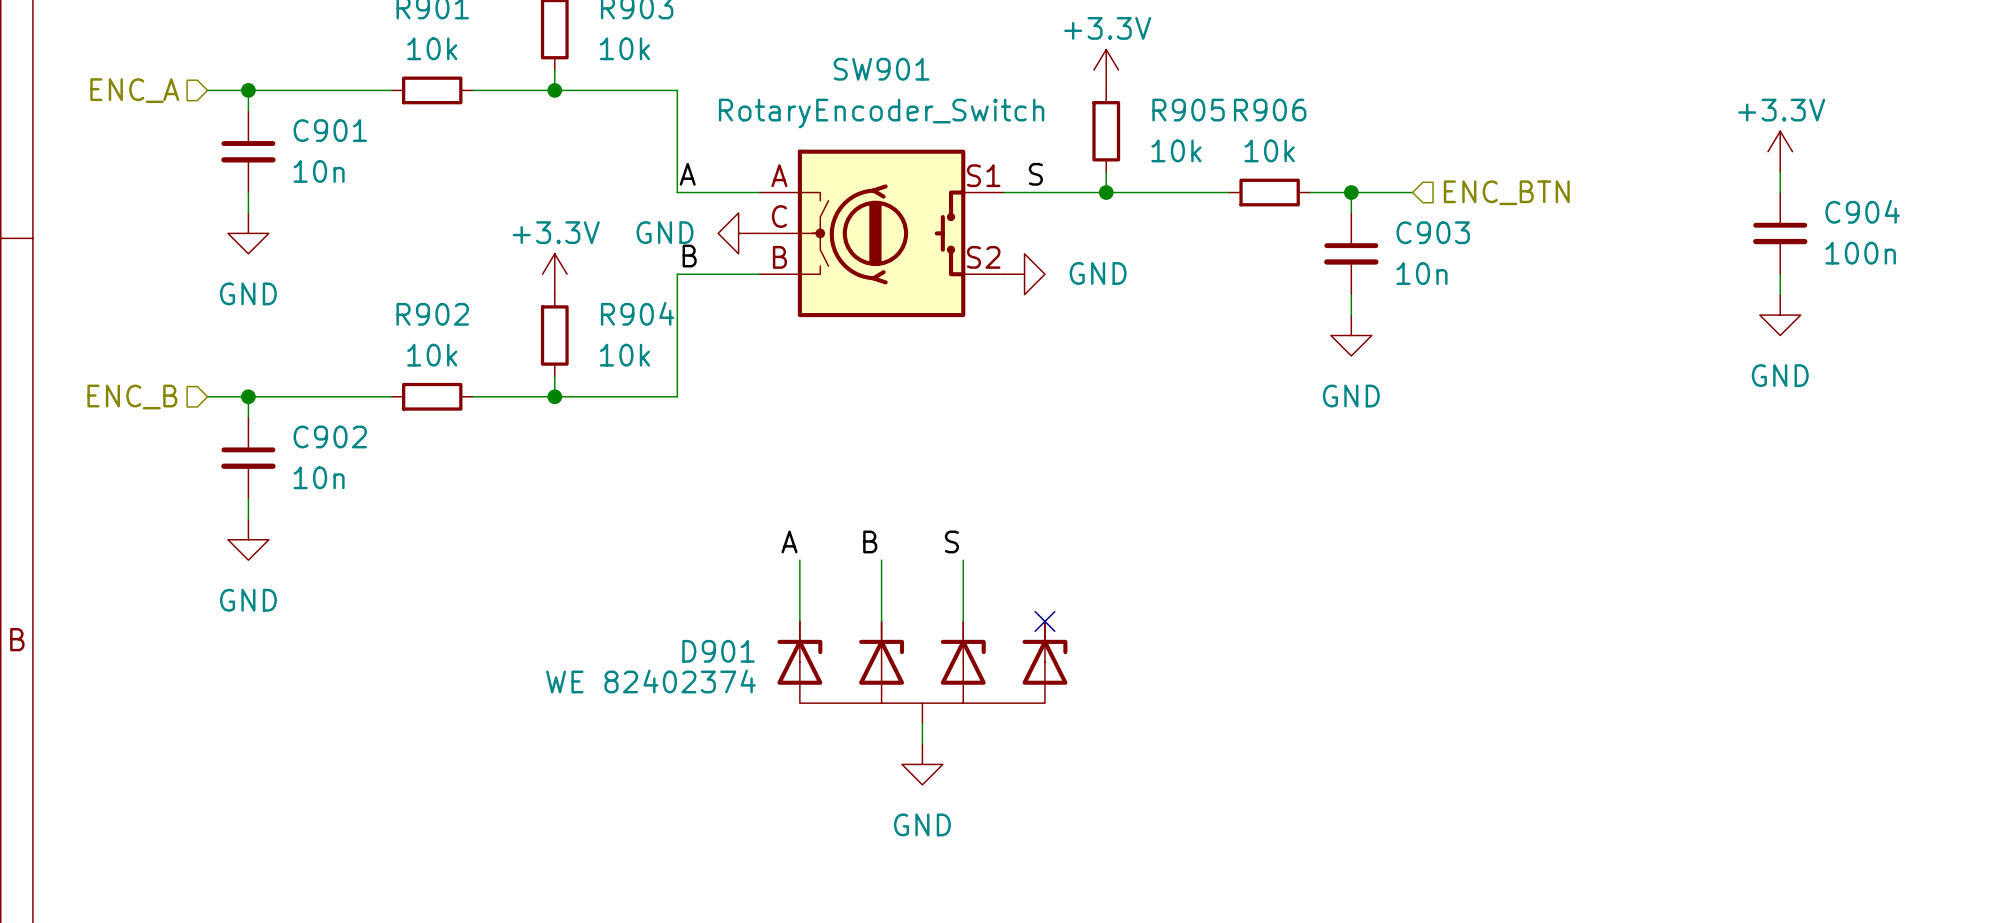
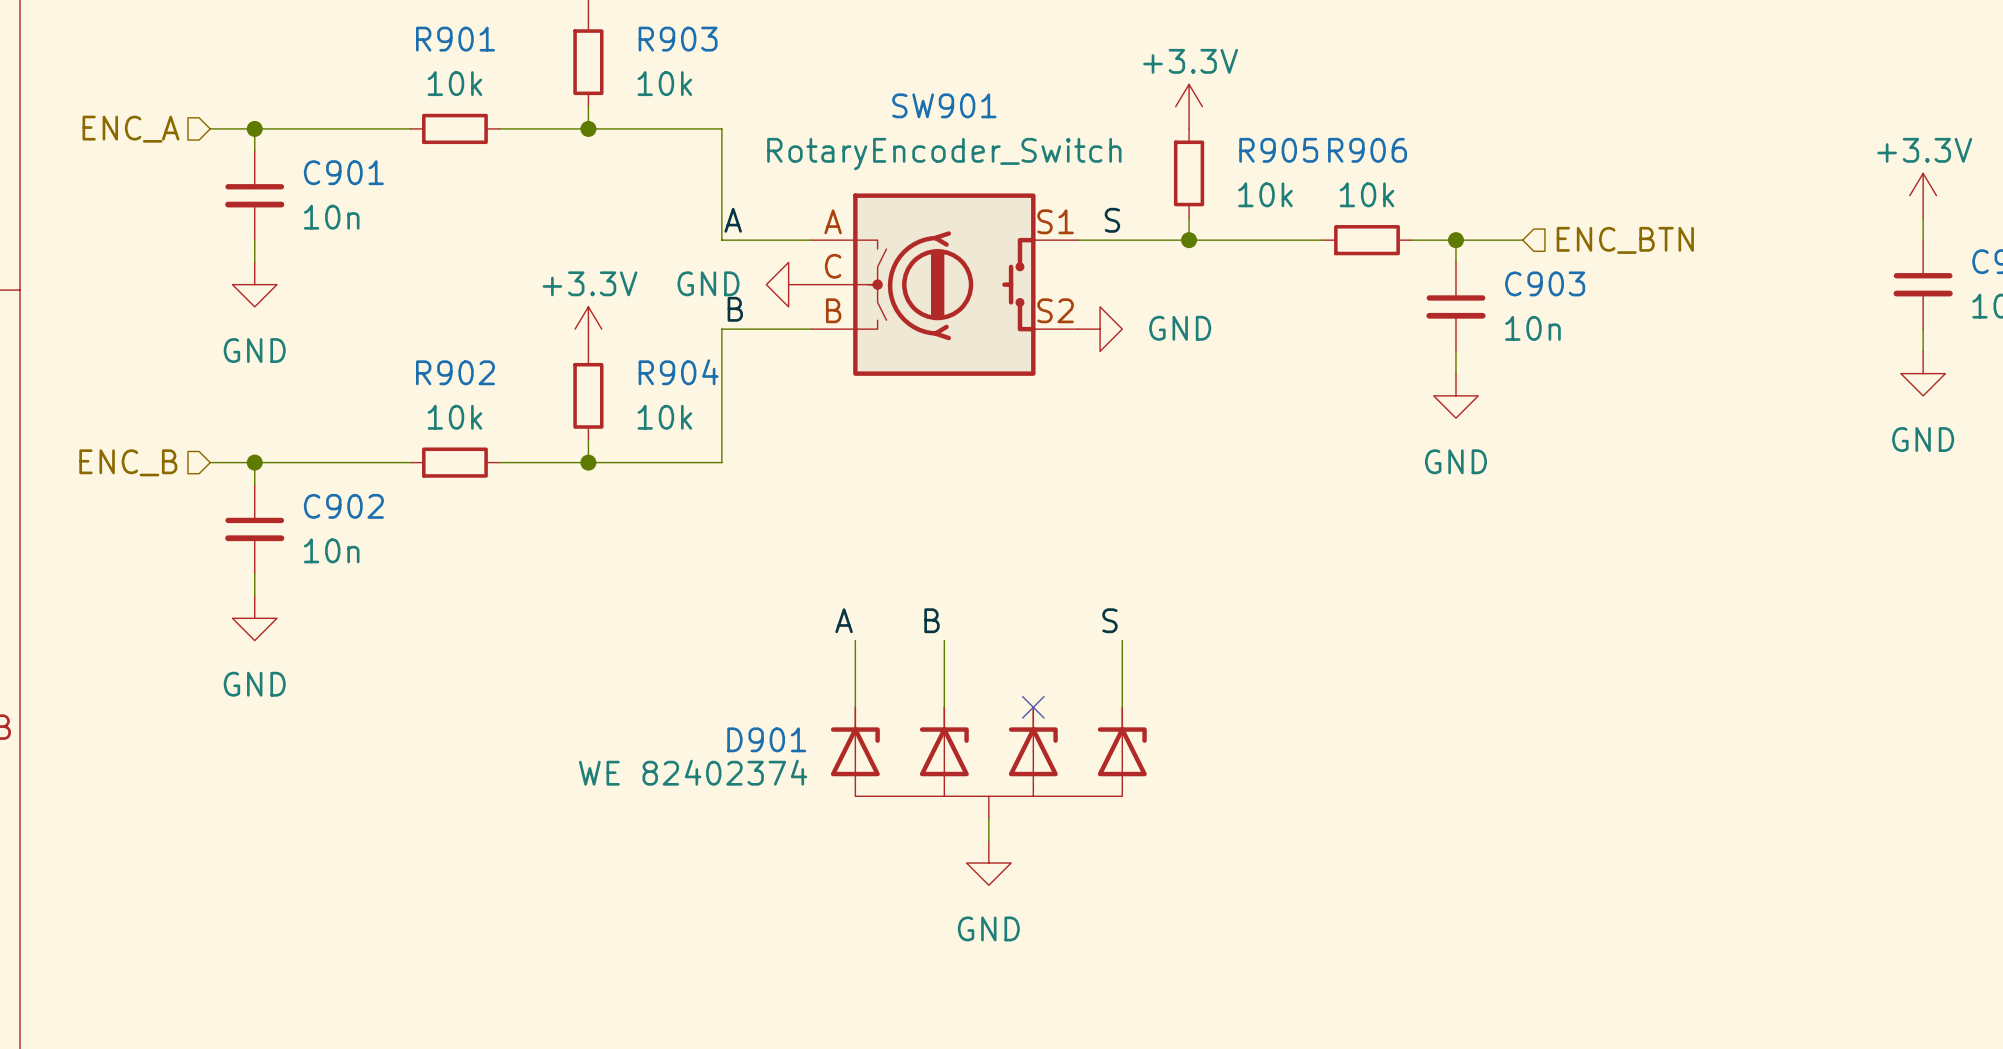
label position: S (951, 541) -> S (1109, 620)
wire: (963, 560) (963, 621) -> (1122, 640) (1122, 707)
no-connect mark position: (1044, 621) -> (1033, 707)

